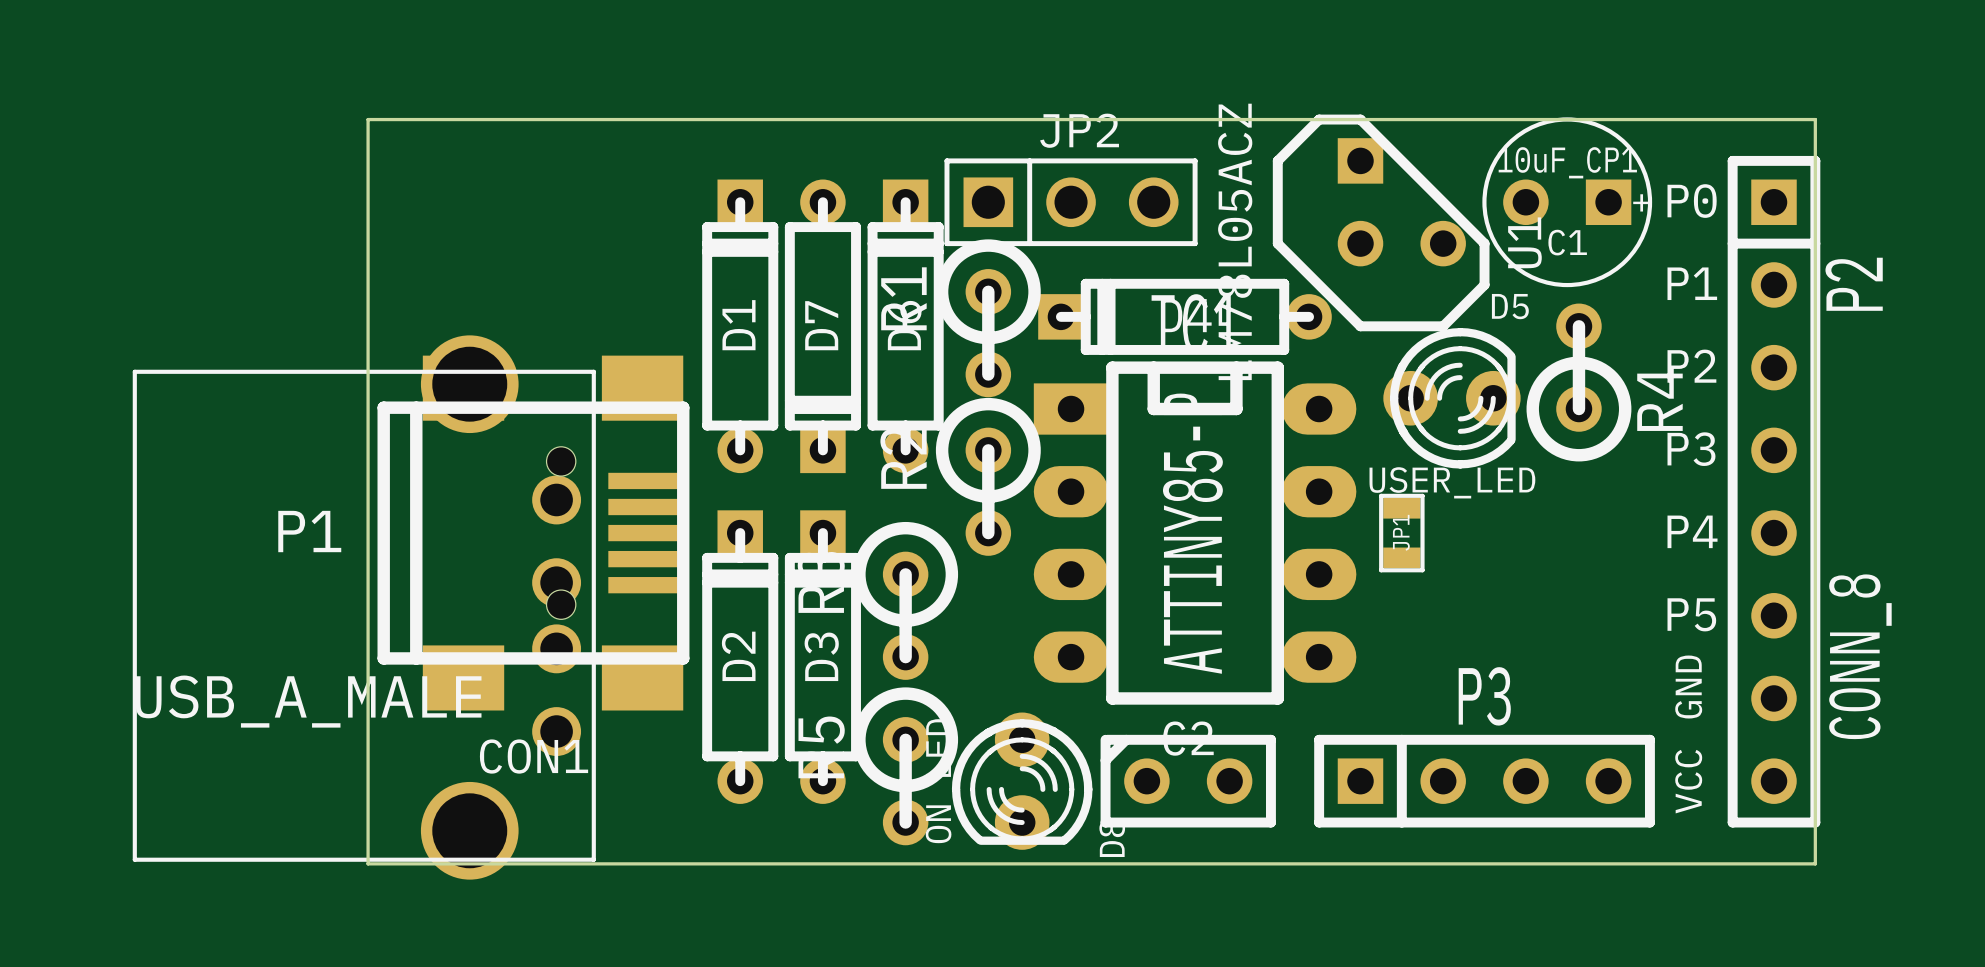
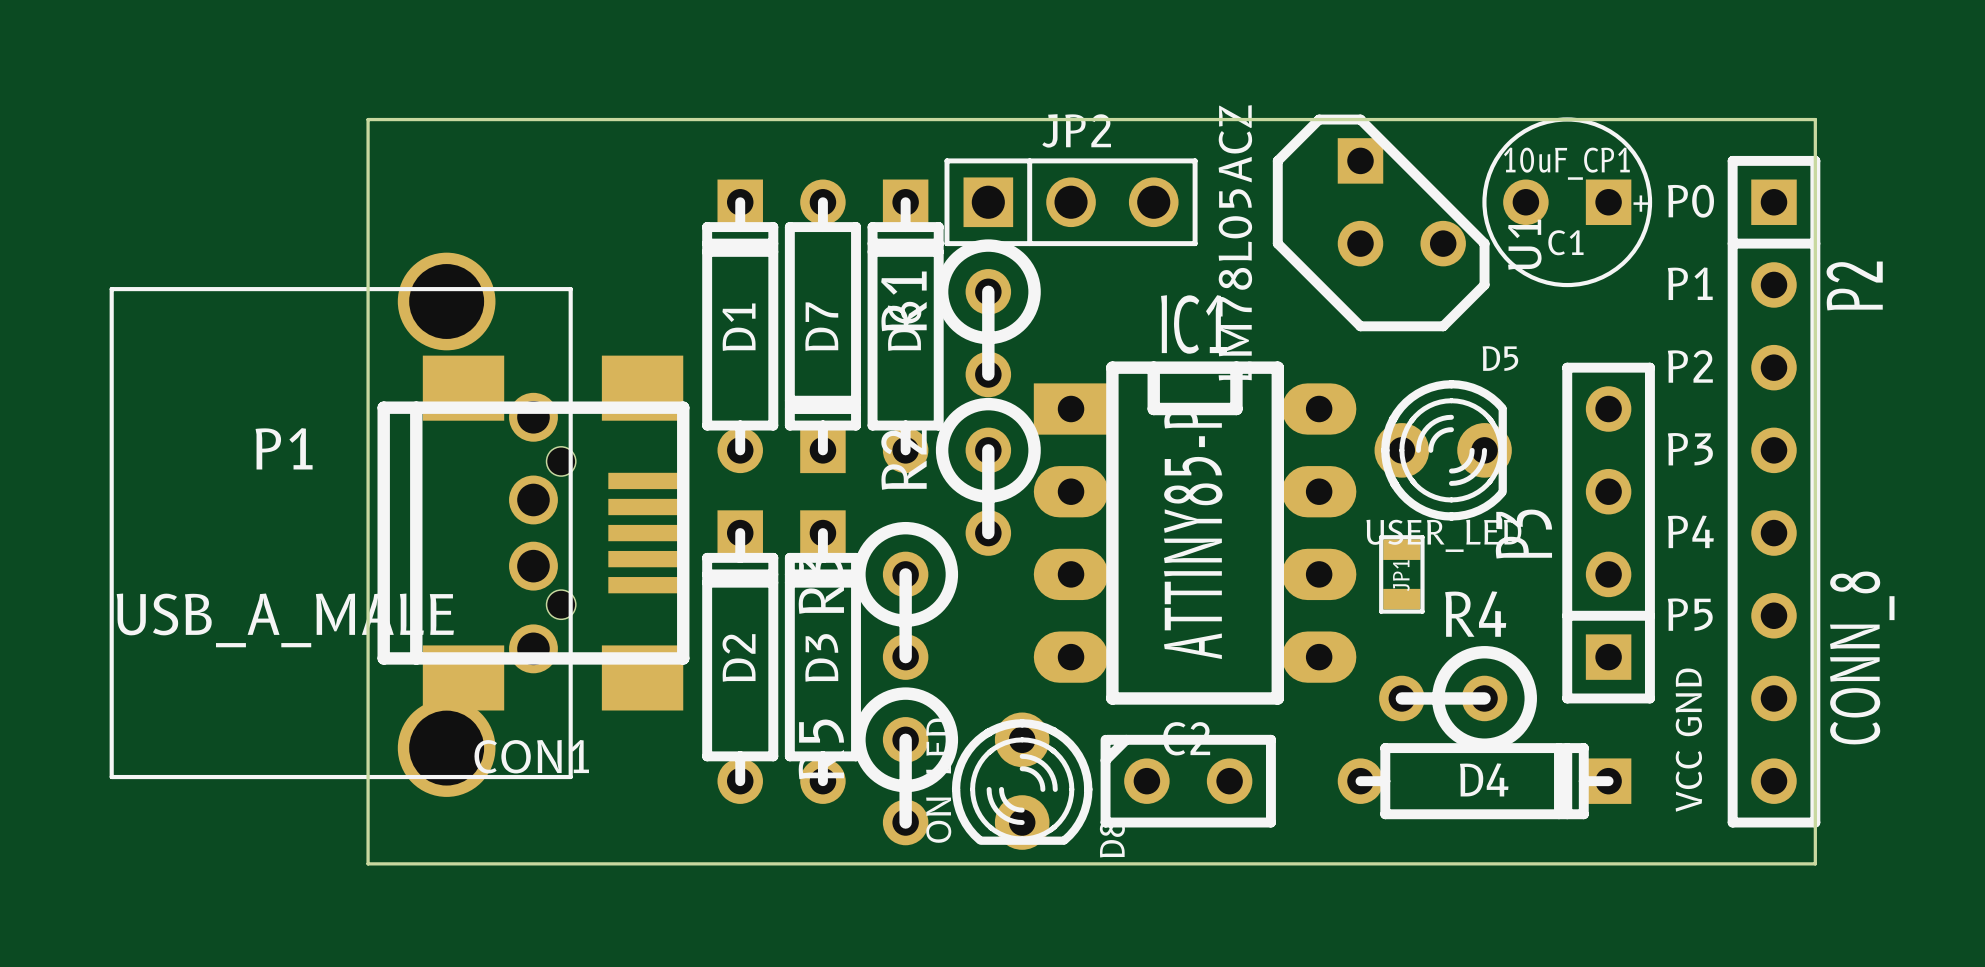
D4 rotation: 0° (1184, 316) -> 180° (1484, 781)
D4 position: (1184, 316) -> (1484, 781)
R4 rotation: 0° (1578, 382) -> 90° counterclockwise (1458, 698)
R4 position: (1578, 382) -> (1458, 698)
D5 position: (1451, 398) -> (1443, 450)
JP1 position: (1401, 533) -> (1401, 574)
P1 position: (364, 607) -> (341, 524)
P3 rotation: 0° (1484, 781) -> 90° counterclockwise (1608, 533)
P3 position: (1484, 781) -> (1608, 533)

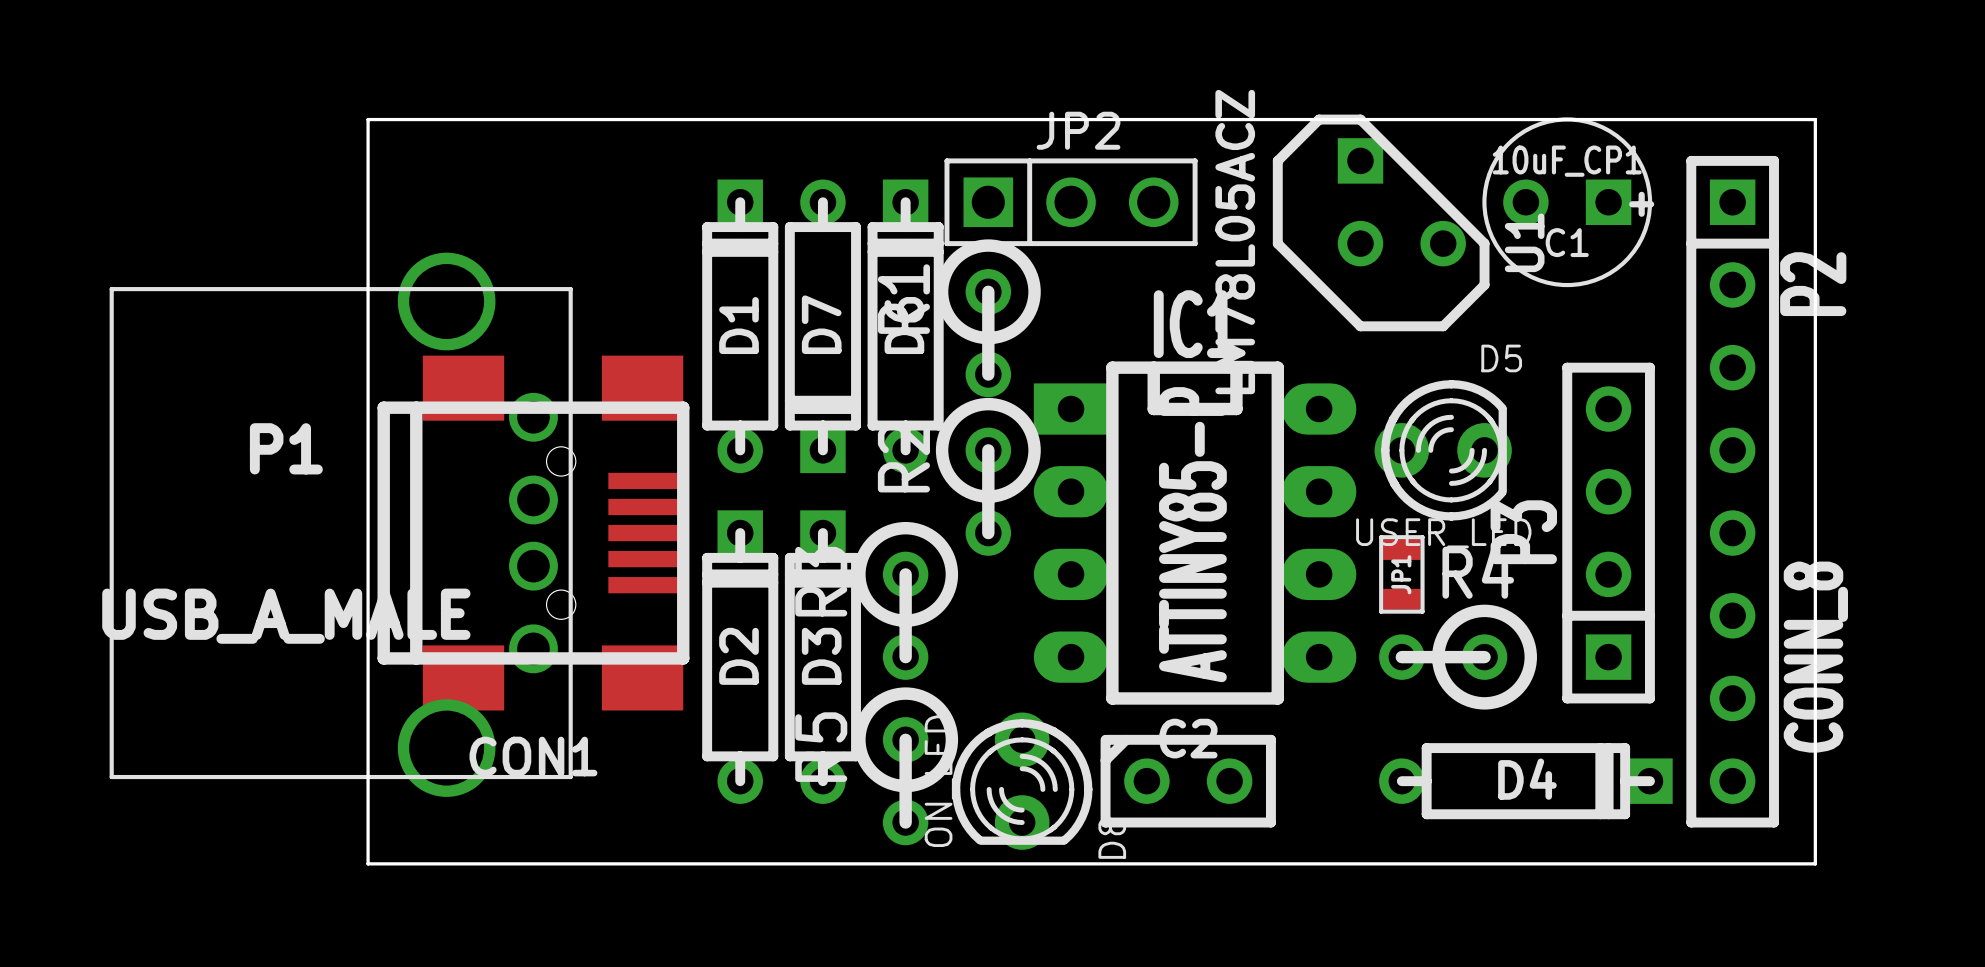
text: P0 (1690, 201) -> none
text: P1 (1690, 283) -> none
text: P2 (1690, 366) -> none
text: P3 (1690, 449) -> none
P2 position: (1774, 491) -> (1732, 491)
text: P4 (1690, 531) -> none
text: P5 (1690, 614) -> none
R4 position: (1458, 698) -> (1458, 657)
text: GND (1688, 702) -> none
D4 position: (1484, 781) -> (1525, 781)
text: VCC (1688, 781) -> none

